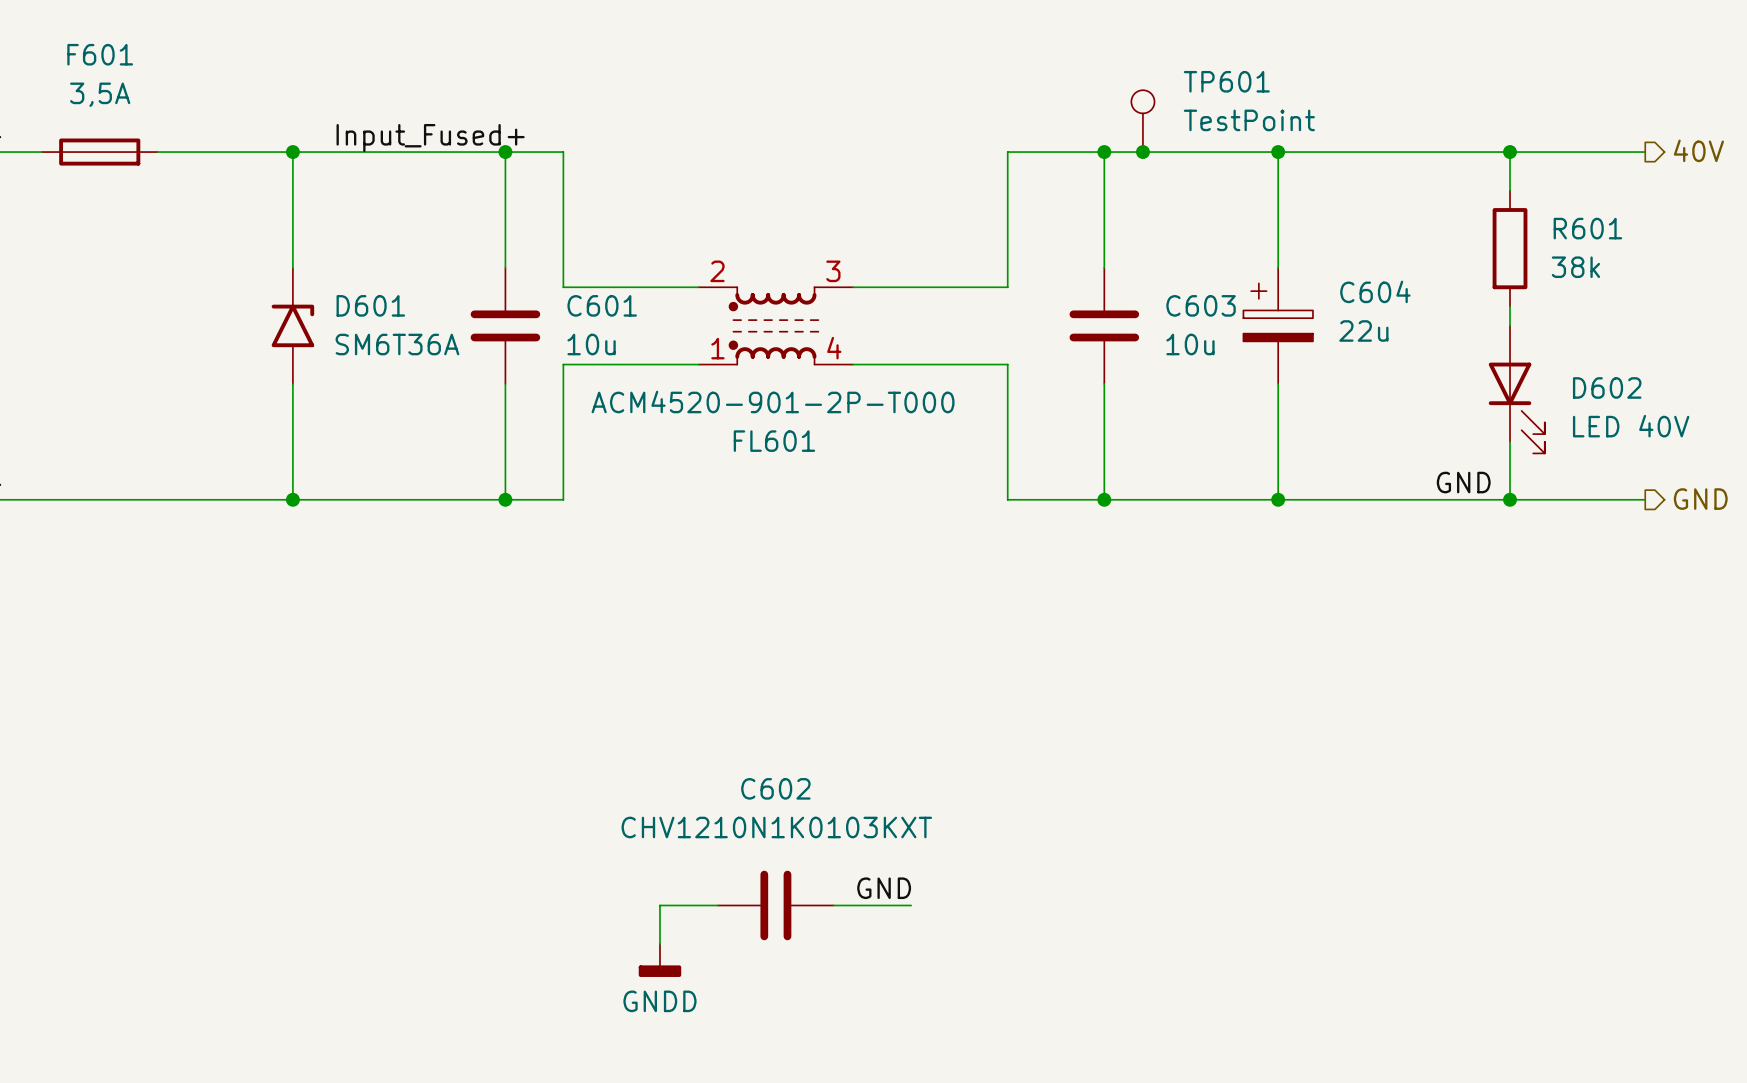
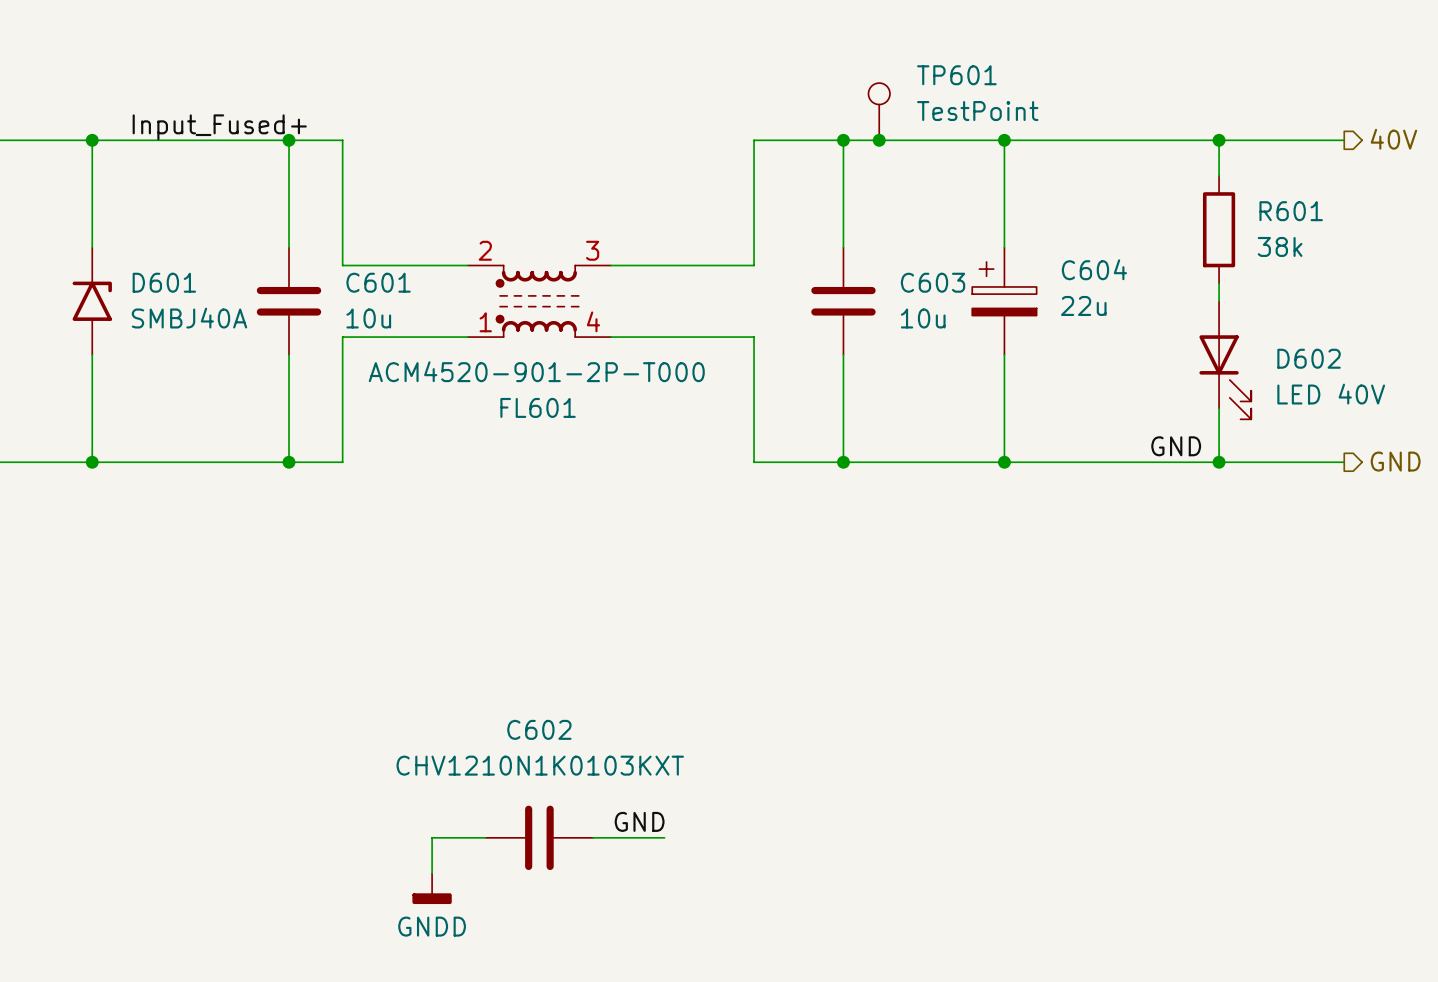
D601 value: SM6T36A (397, 344) -> SMBJ40A (189, 318)

